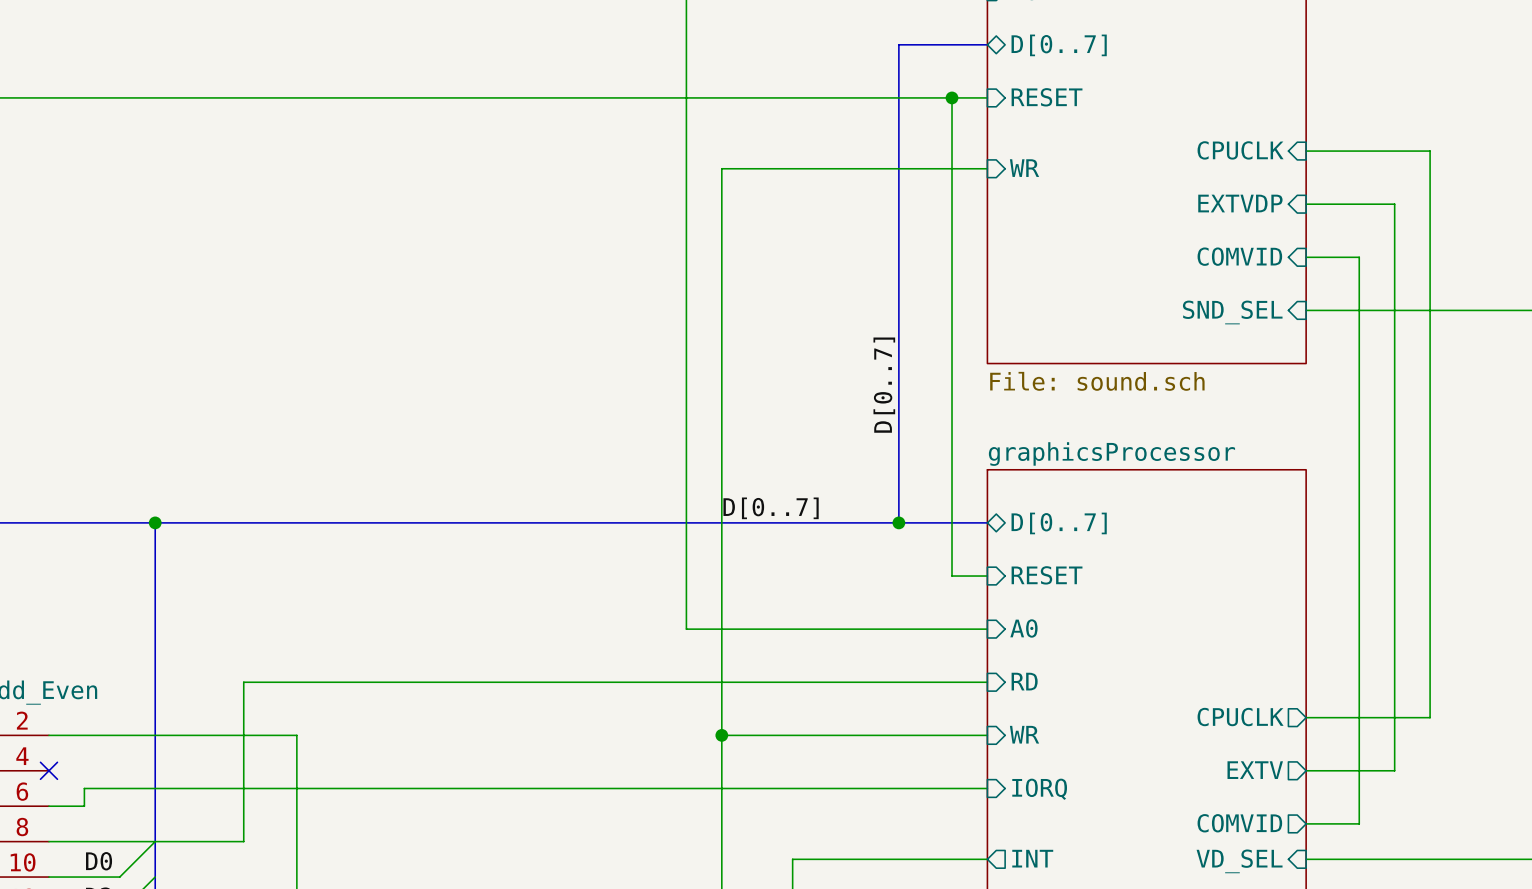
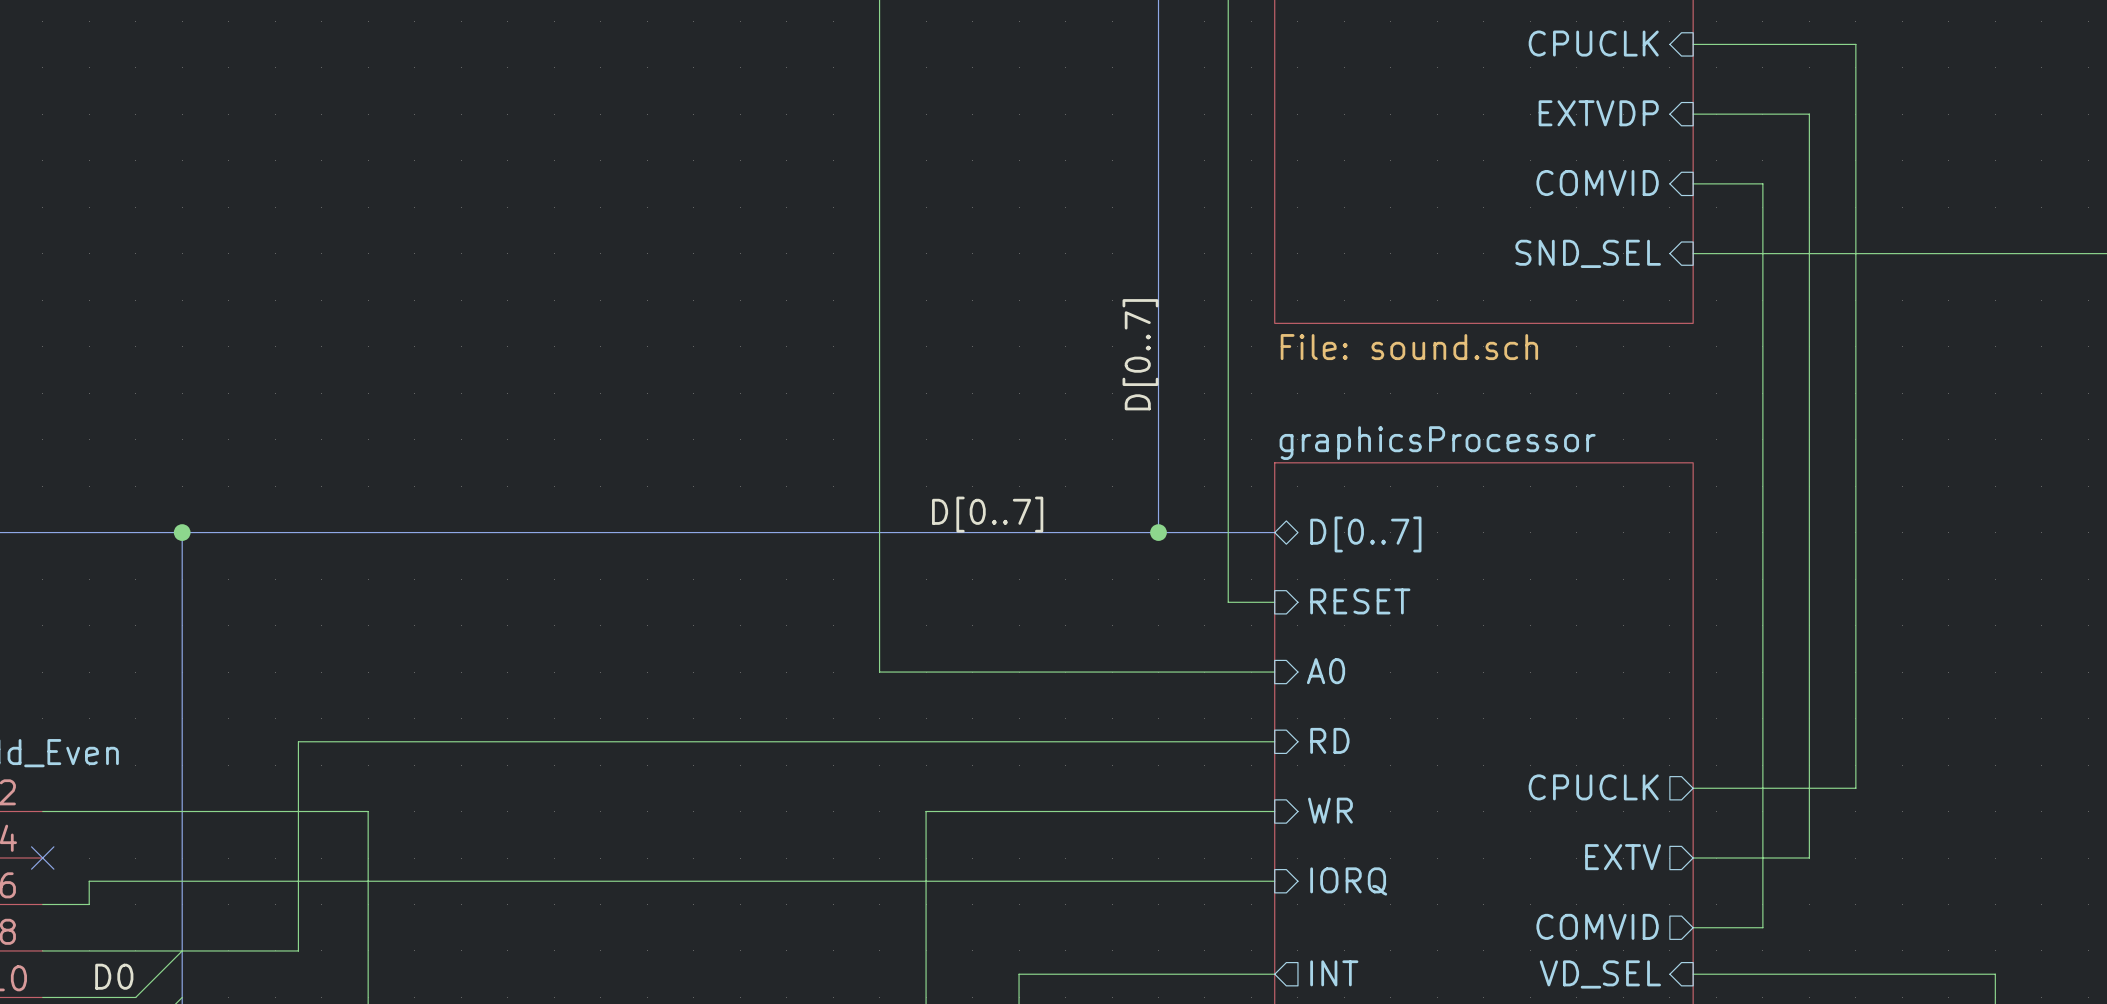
wire: (987, 168) (721, 168) (721, 735) -> none
sheet pin: WR (1024, 168) -> none
junction: (721, 735) -> none

